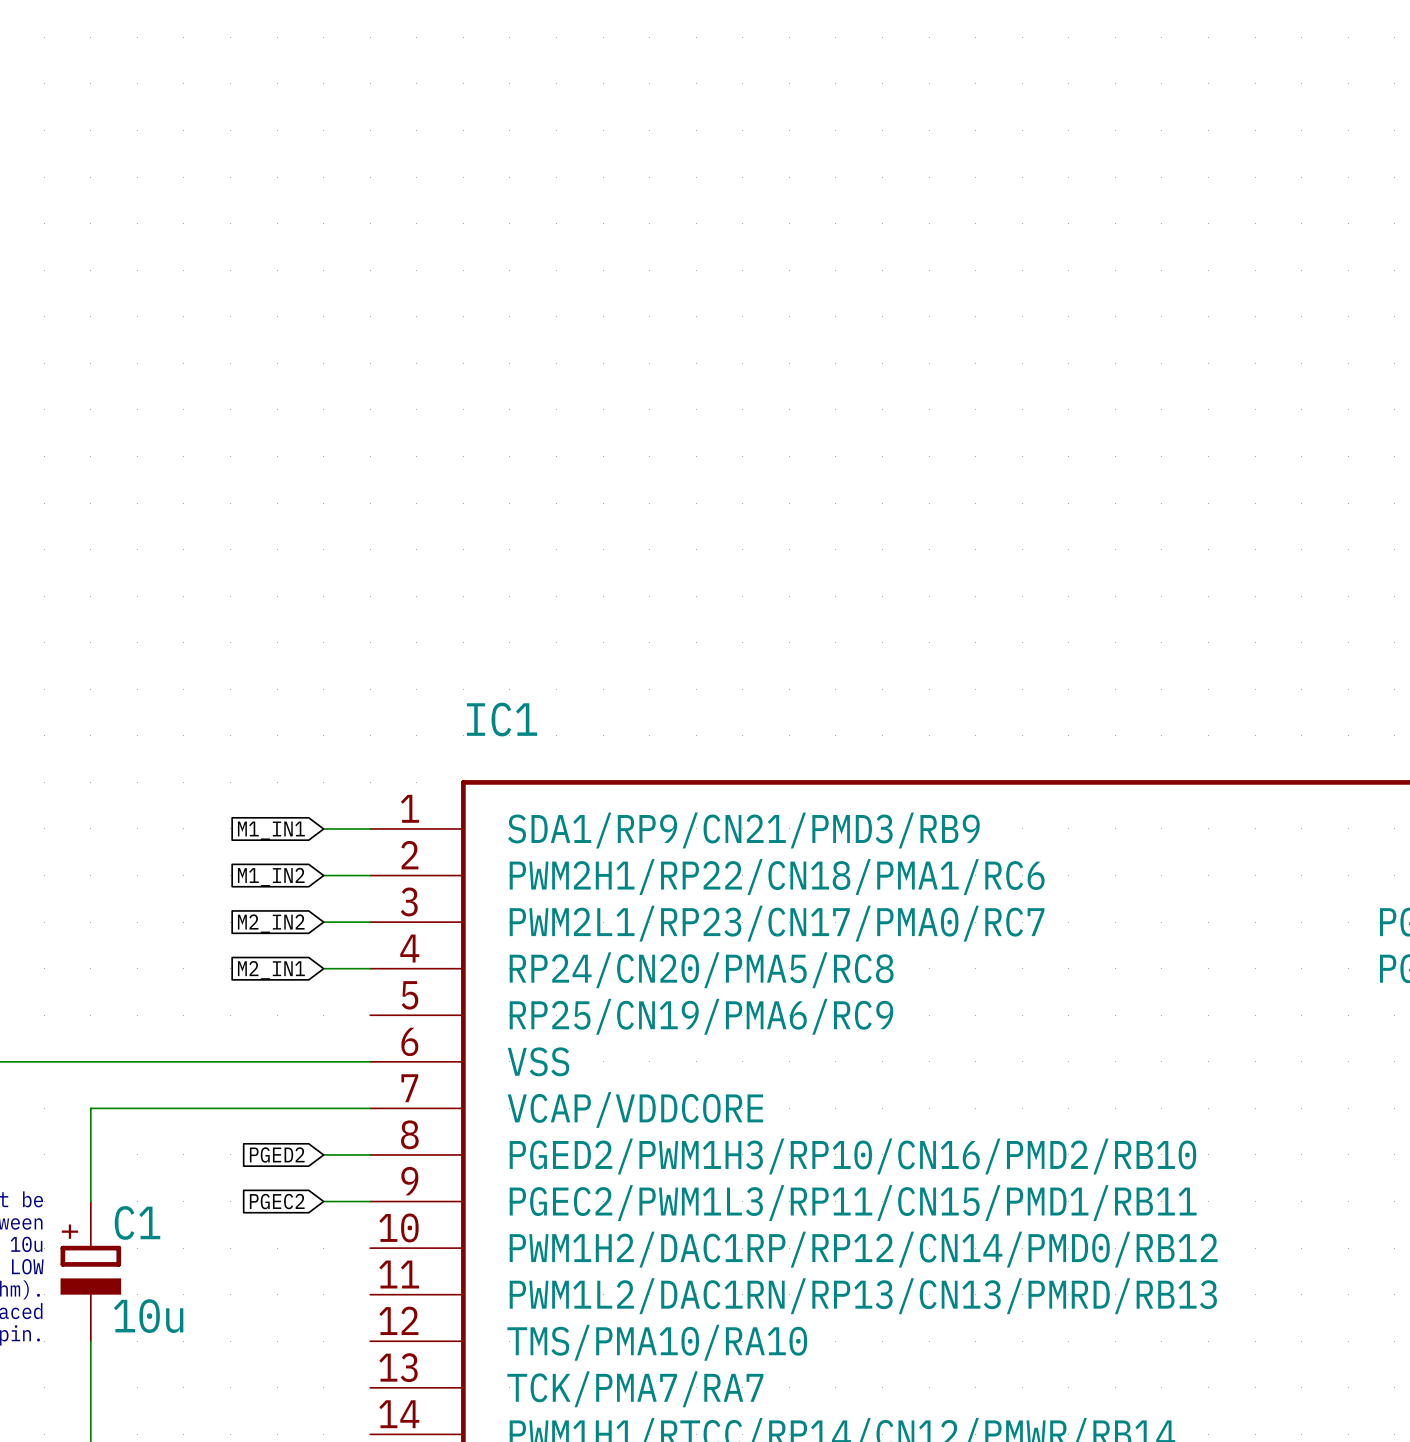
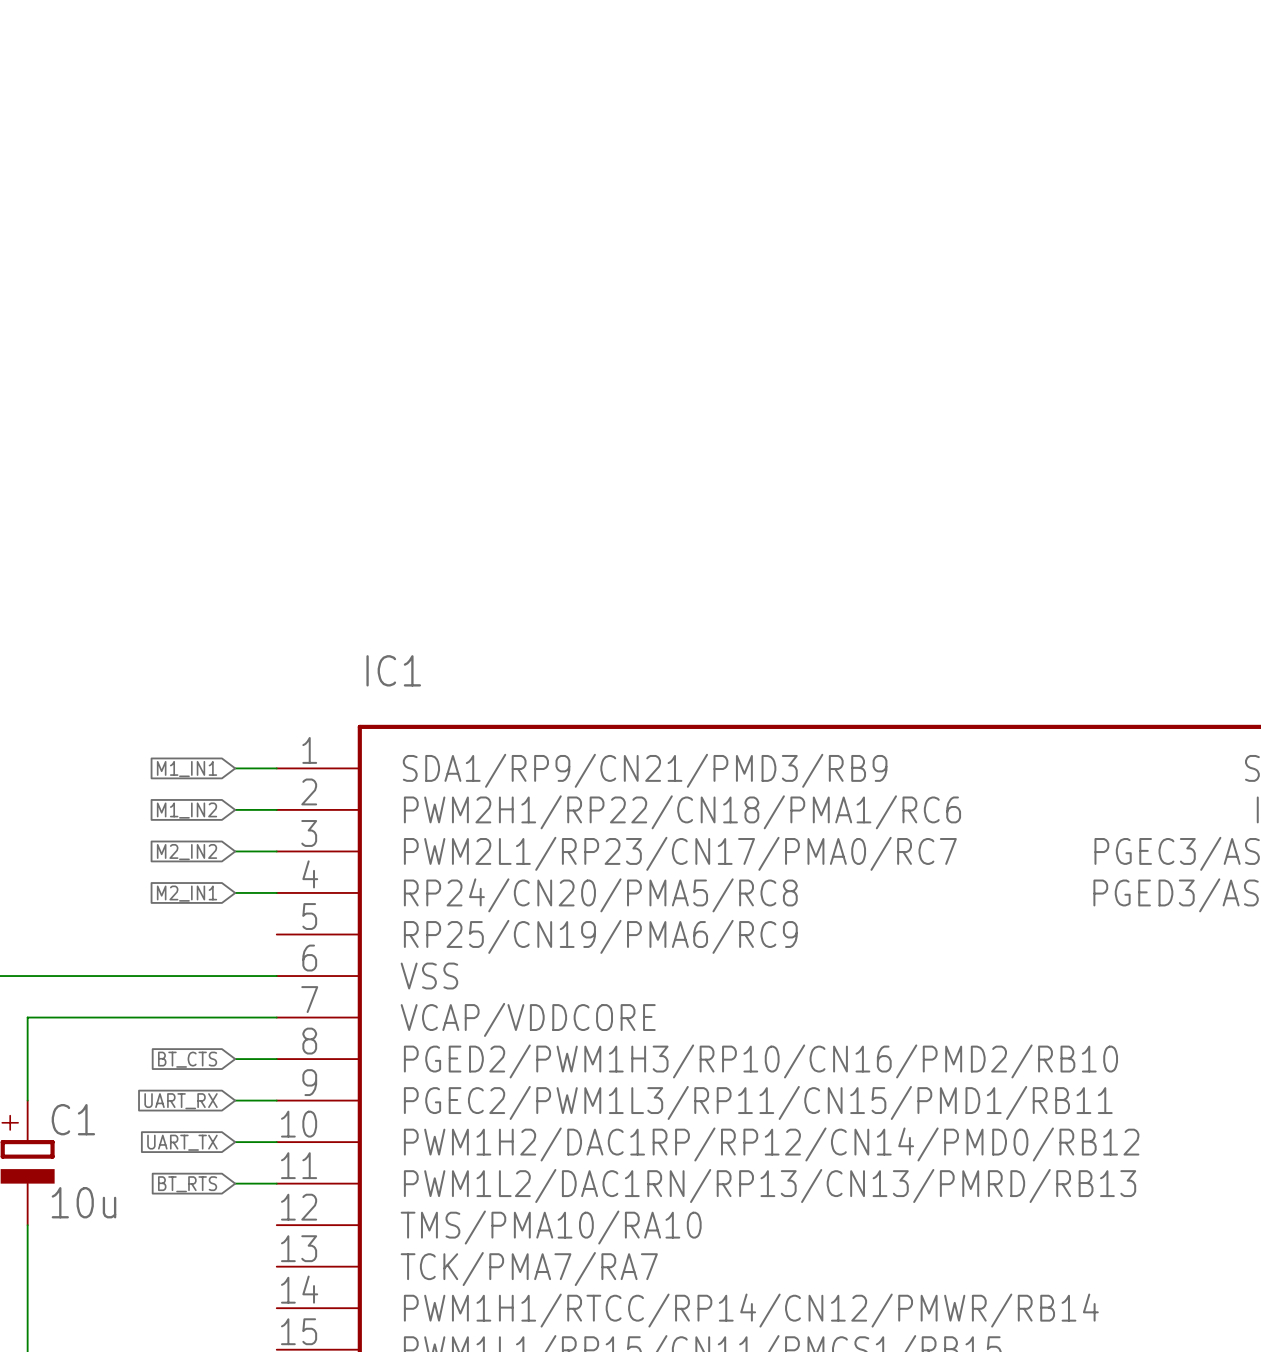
global label: PGED2 (277, 1154) -> BT_CTS (187, 1059)
global label: PGEC2 (277, 1201) -> UART_RX (181, 1101)
wire: none -> (235, 1142) (276, 1142)
global label: none -> UART_TX (182, 1142)
wire: none -> (235, 1183) (276, 1183)
global label: none -> BT_RTS (187, 1184)

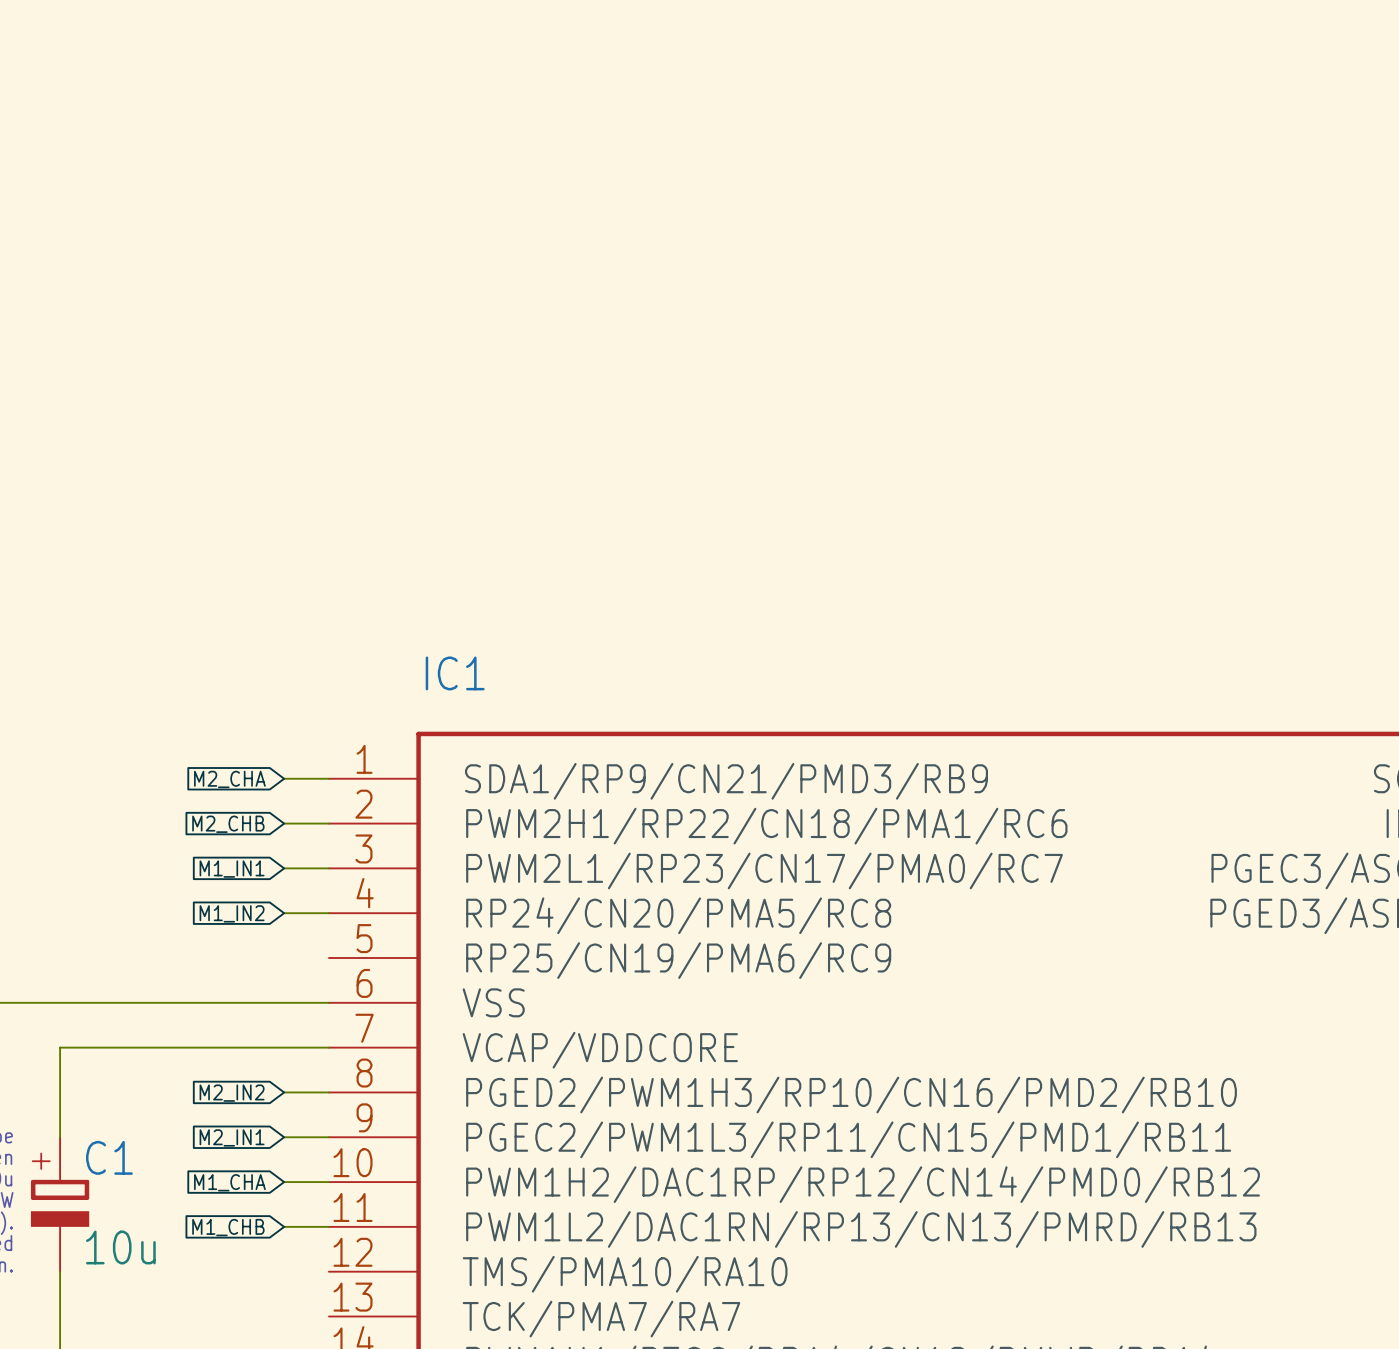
global label: M1_IN1 (187, 769) -> M2_CHA (229, 779)
global label: M1_IN2 (187, 810) -> M2_CHB (228, 824)
global label: M2_IN2 (187, 852) -> M1_IN1 (232, 869)
global label: M2_IN1 (187, 893) -> M1_IN2 (232, 913)
global label: BT_CTS (187, 1059) -> M2_IN2 (232, 1093)
global label: UART_RX (181, 1101) -> M2_IN1 (232, 1137)
global label: UART_TX (182, 1142) -> M1_CHA (229, 1182)
global label: BT_RTS (187, 1184) -> M1_CHB (228, 1227)

